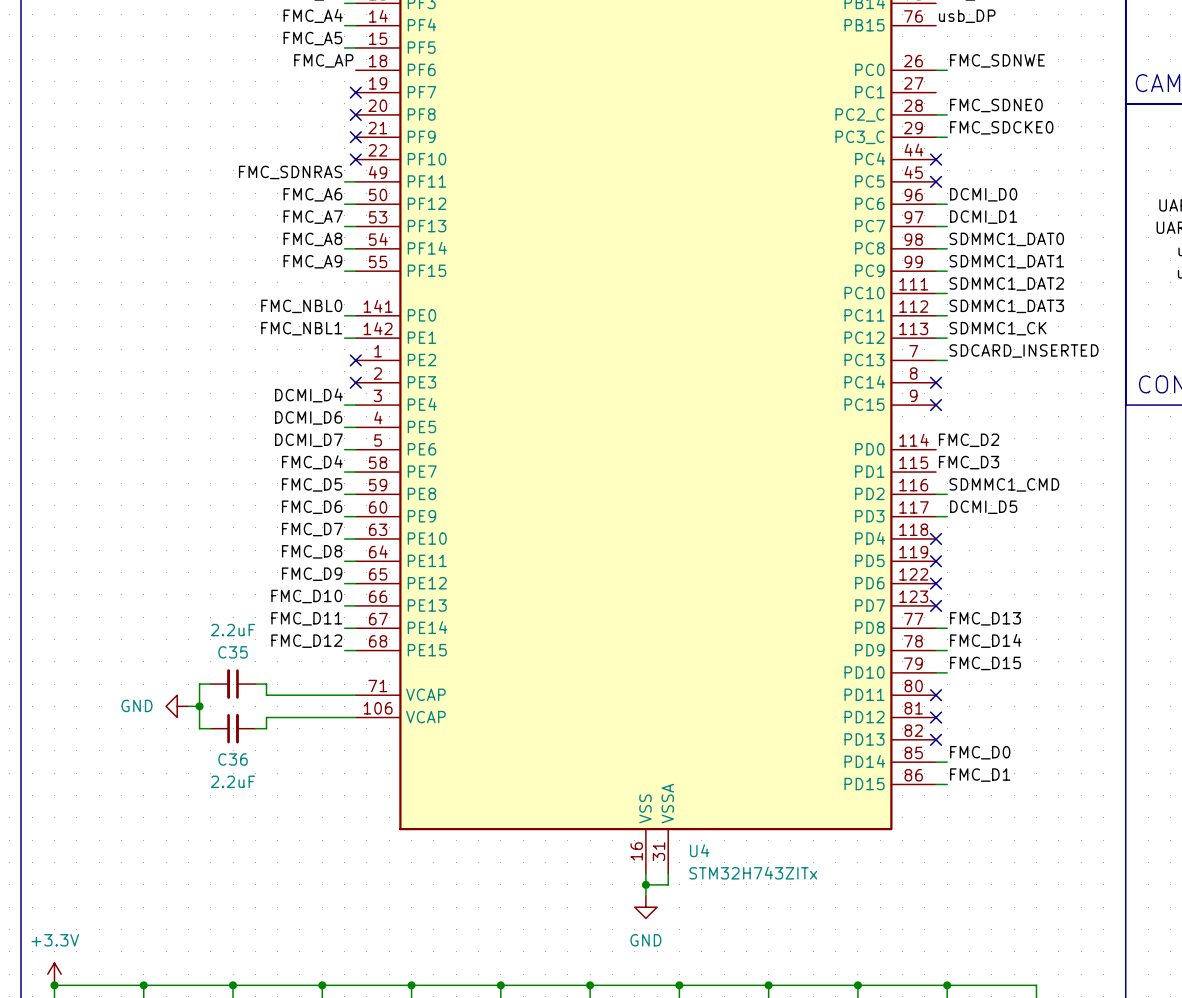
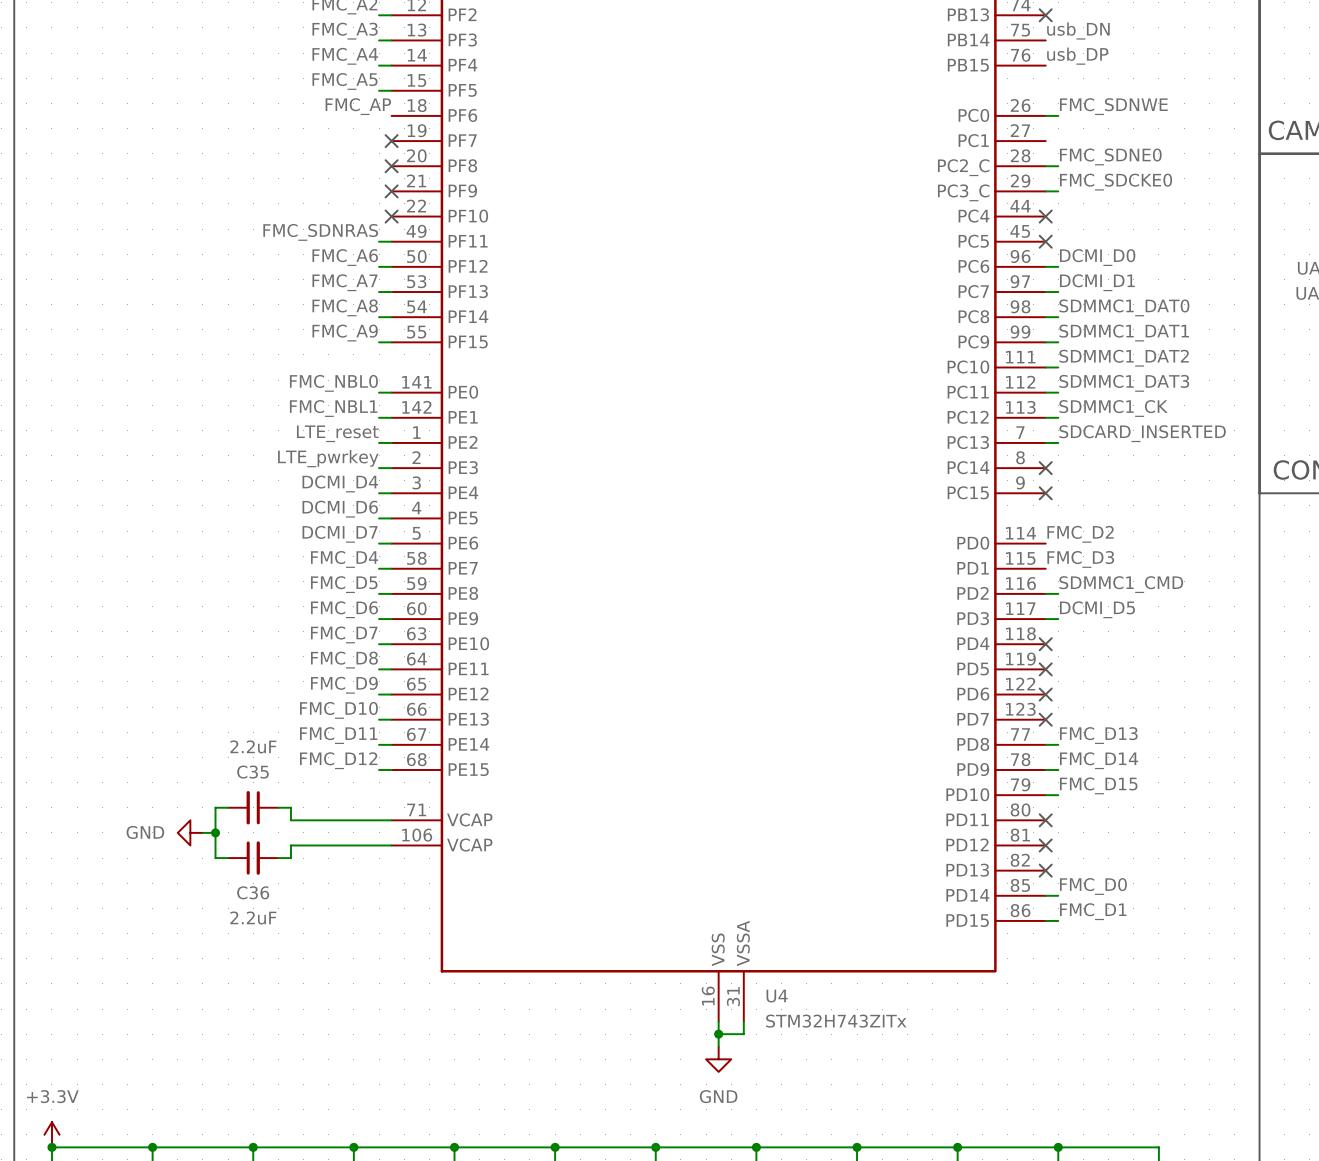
label: none -> LTE_reset (337, 433)
wire: none -> (379, 442) (391, 442)
no-connect mark: (355, 360) -> none
label: none -> LTE_pwrkey (328, 458)
wire: none -> (379, 468) (391, 468)
no-connect mark: (355, 382) -> none

